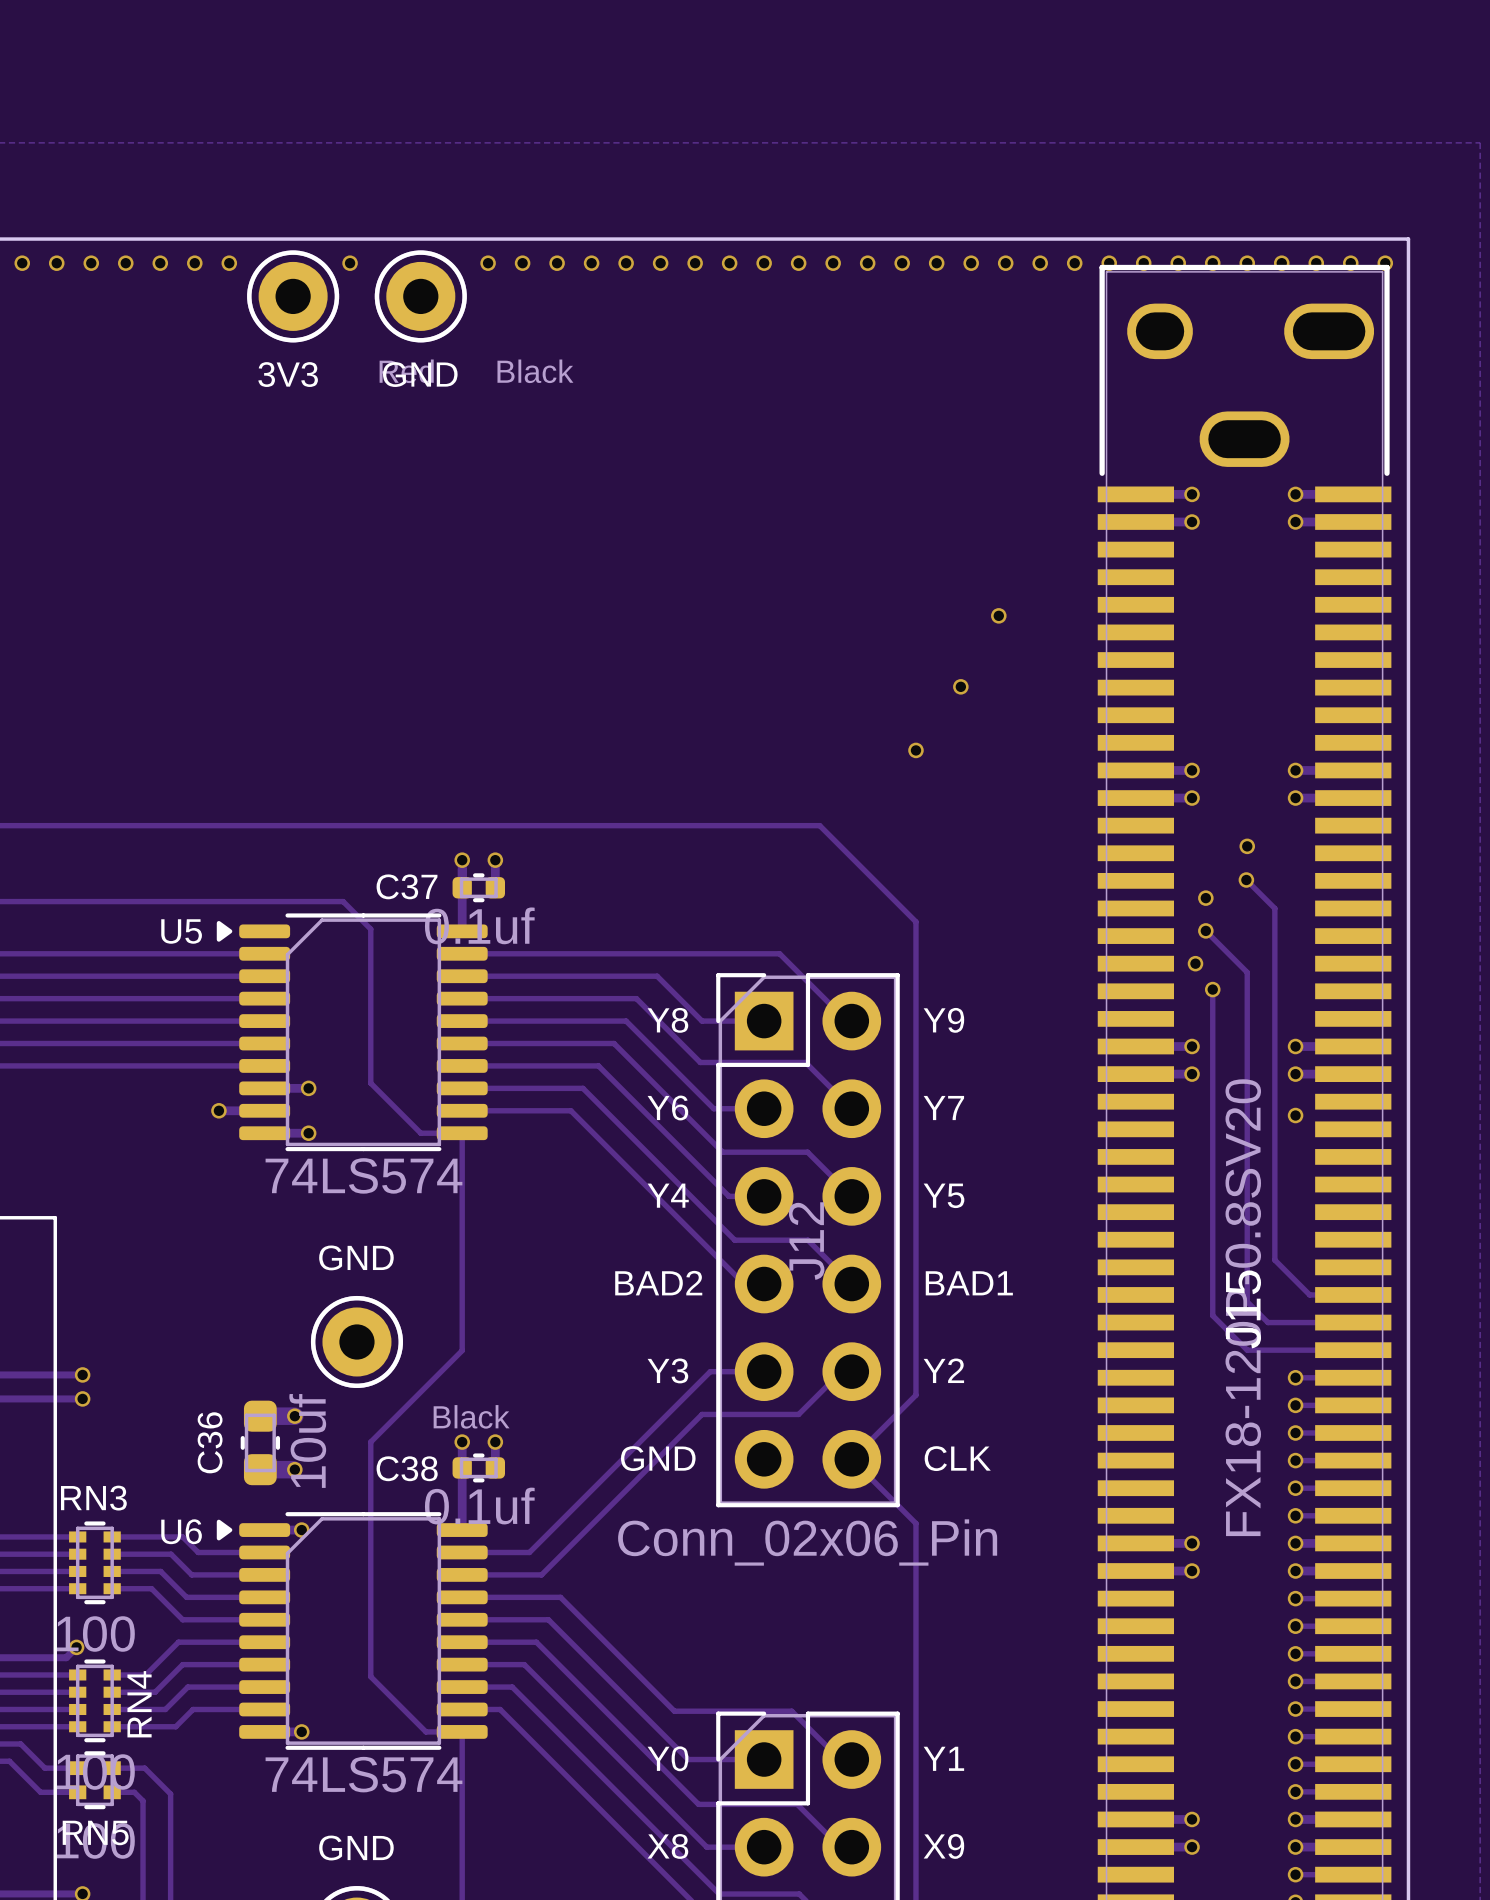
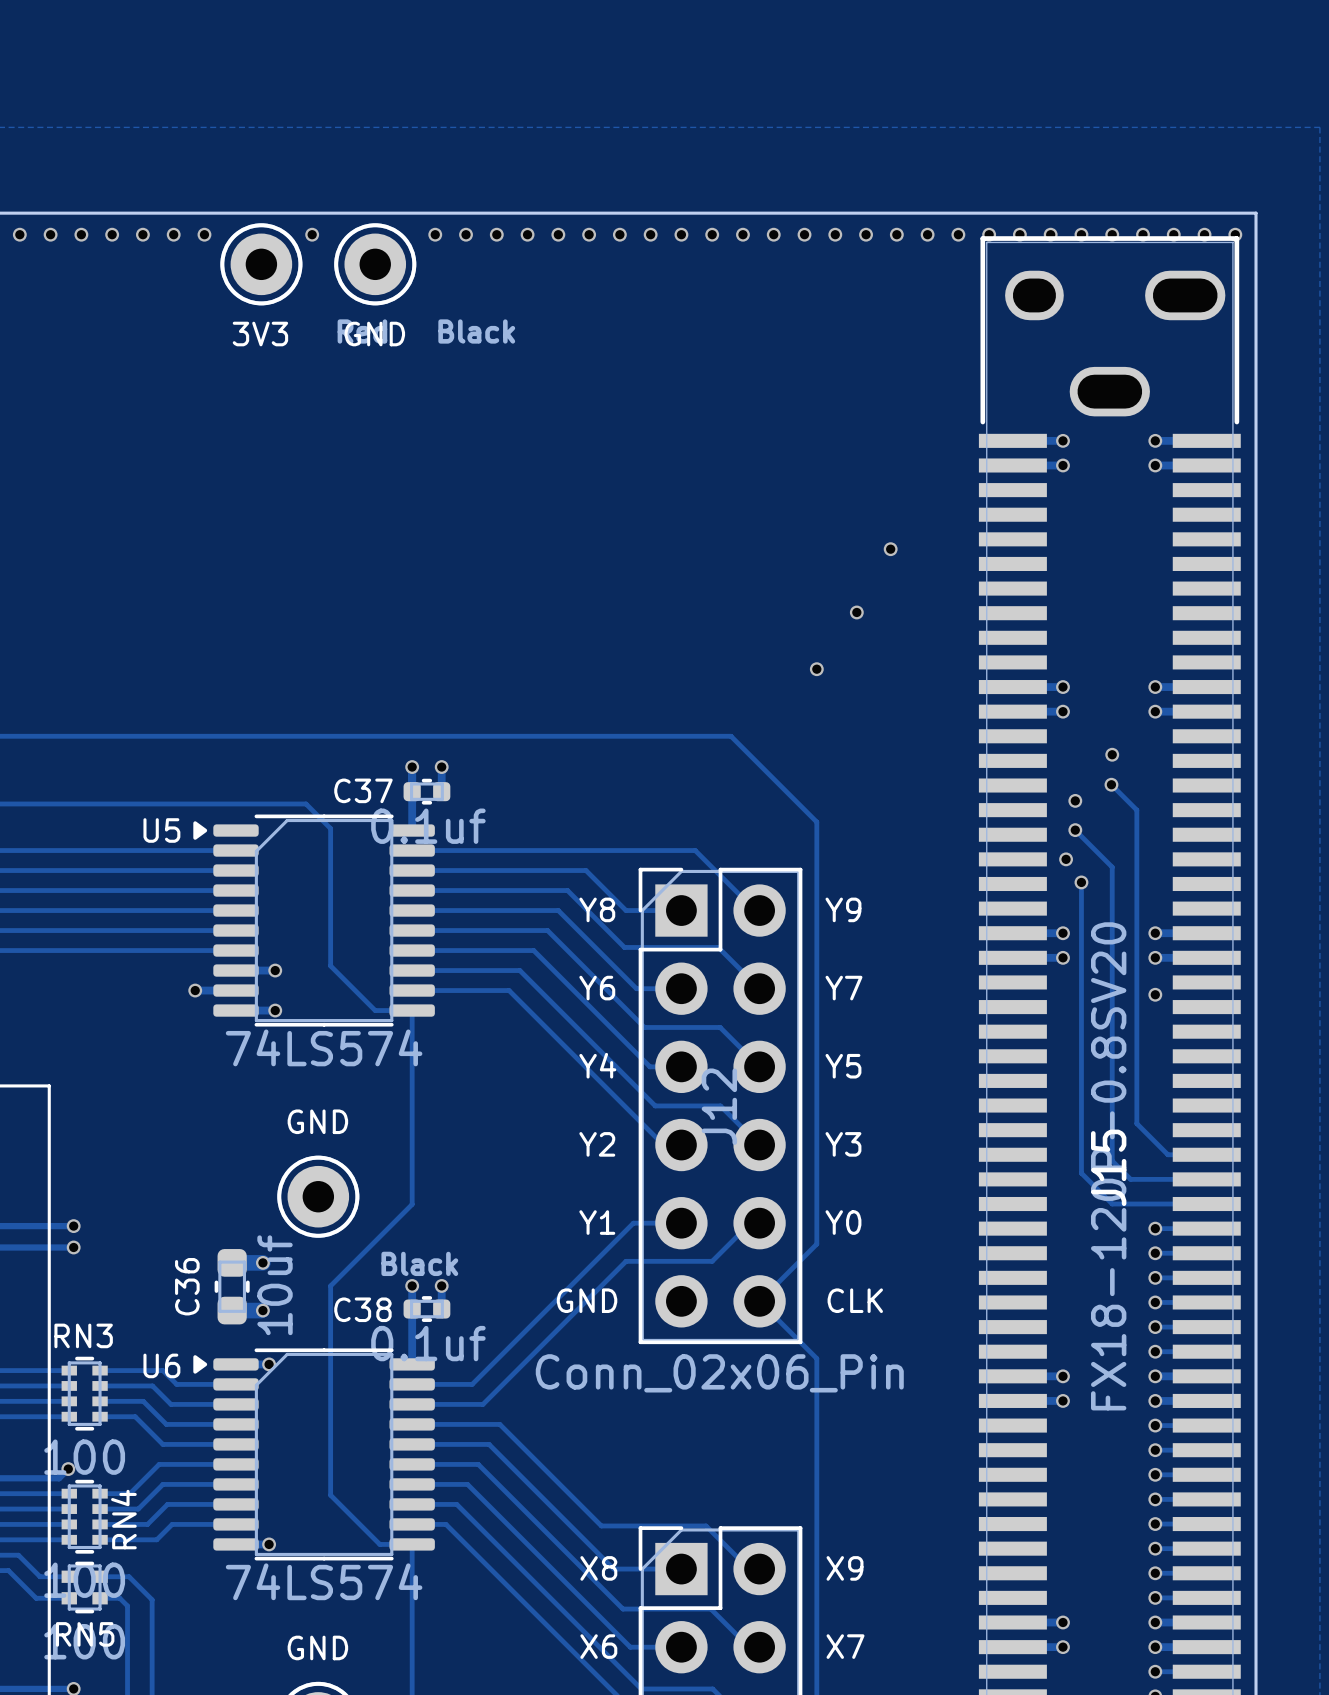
text: BAD2 (658, 1283) -> Y2 (597, 1144)
text: BAD1 (969, 1283) -> Y3 (843, 1144)
text: Y3 (667, 1370) -> Y1 (597, 1222)
text: Y2 (943, 1370) -> Y0 (843, 1222)
text: Y0 (668, 1758) -> X8 (598, 1568)
text: Y1 (943, 1758) -> X9 (845, 1568)
text: X8 (667, 1846) -> X6 (598, 1646)
text: X9 (943, 1846) -> X7 (845, 1646)

